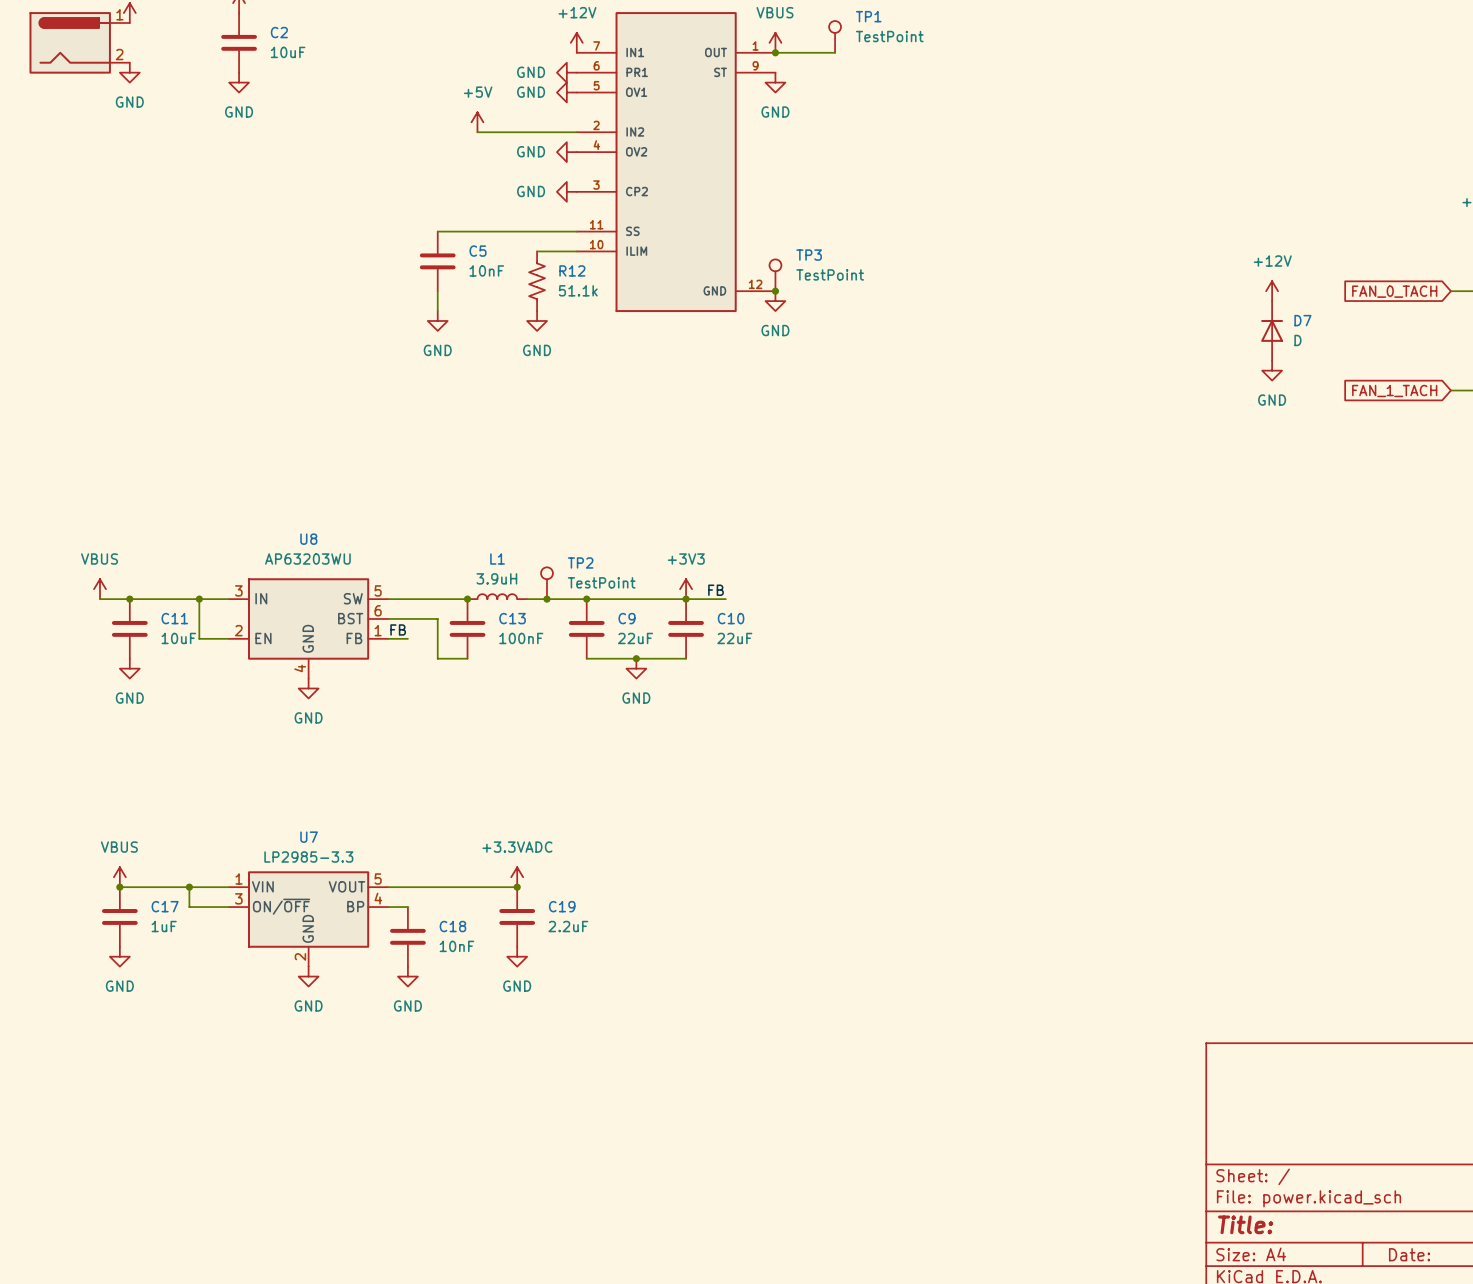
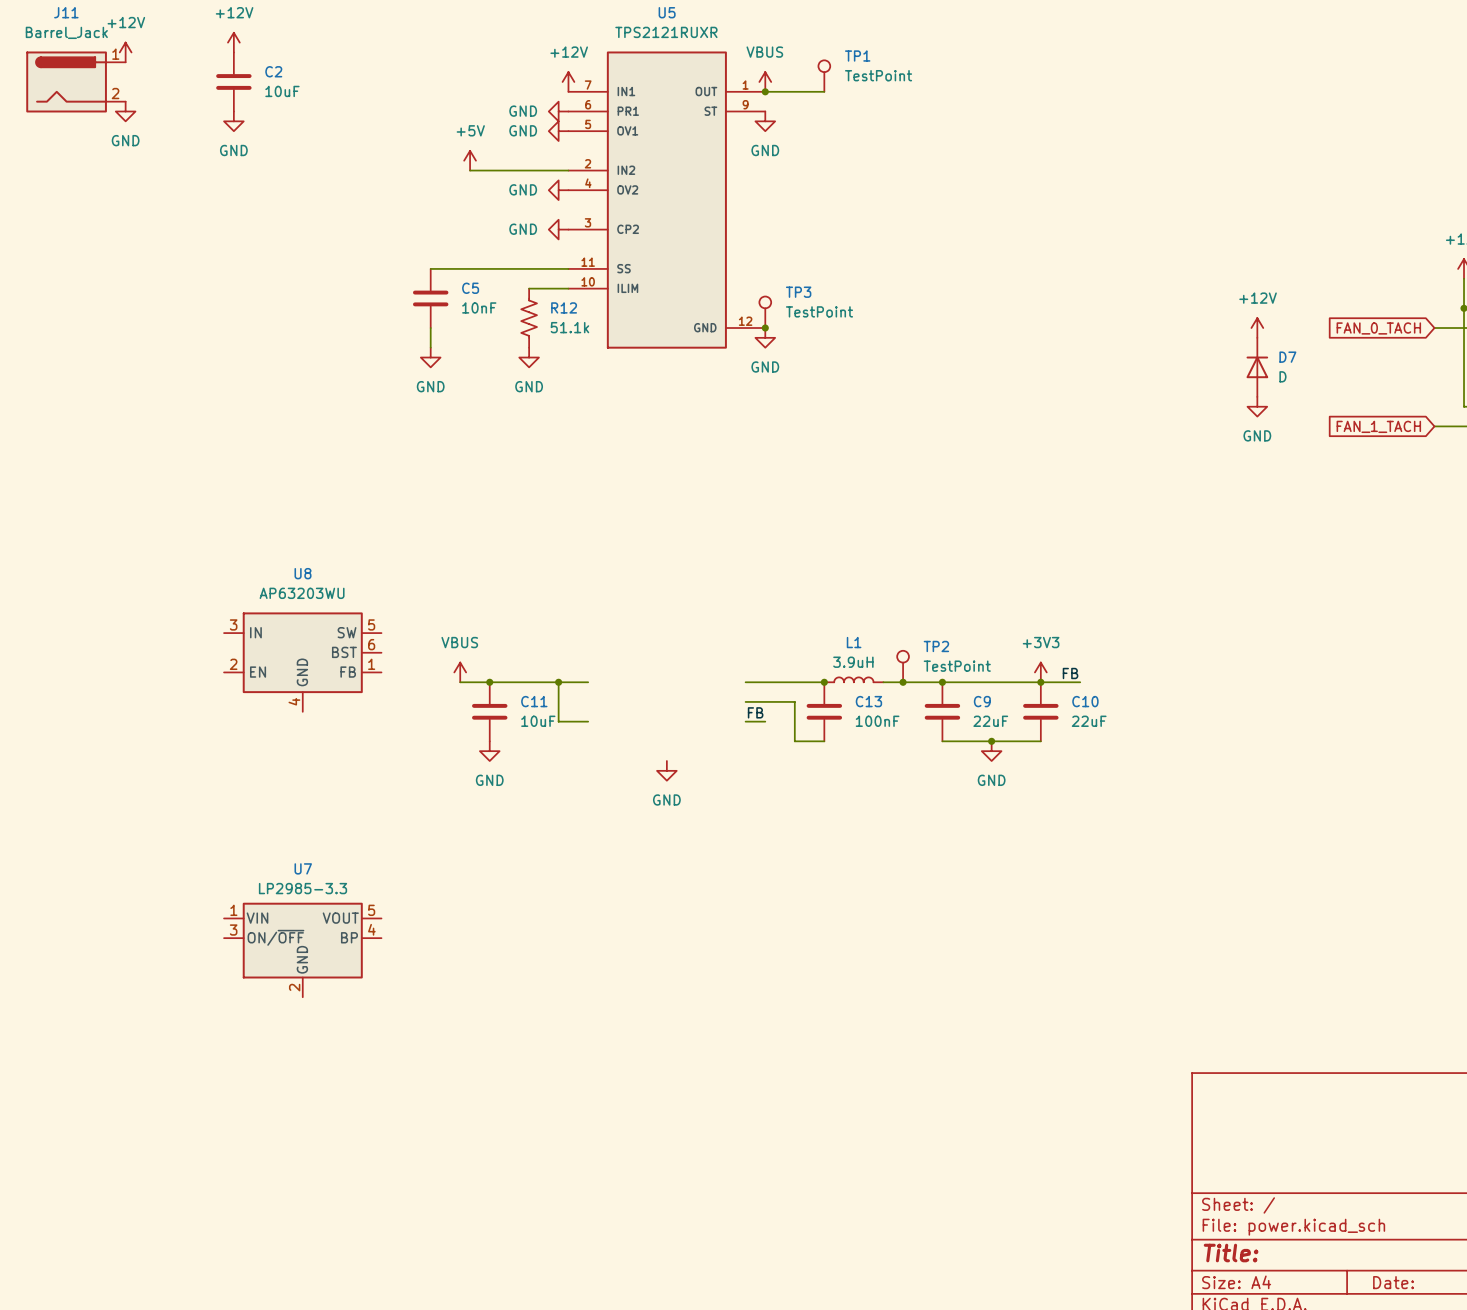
TP2 position: (546, 583) -> (903, 666)
power symbol: VBUS (100, 589) -> none
power symbol: +3V3 (686, 589) -> none
label position: FB (716, 590) -> FB (755, 712)
L1 position: (497, 596) -> (853, 679)
wire: (100, 599) (229, 599) -> none
junction: (129, 599) -> none
wire: (199, 599) (199, 638) (229, 638) -> none
junction: (199, 599) -> none
wire: (388, 599) (467, 599) -> none
junction: (467, 599) -> none
wire: (527, 599) (725, 599) -> none
junction: (546, 599) -> none
junction: (586, 599) -> none
junction: (686, 599) -> none
wire: (388, 618) (437, 618) (437, 658) (467, 658) -> none
C11 position: (129, 628) -> (489, 711)
C13 position: (467, 628) -> (824, 711)
C9 position: (586, 628) -> (942, 711)
C10 position: (686, 628) -> (1040, 711)
label: FB (398, 629) -> none
wire: (388, 638) (407, 638) -> none
power symbol: none -> VBUS (460, 672)
power symbol: none -> +3V3 (1040, 672)
label: none -> FB (1070, 673)
wire: none -> (460, 682) (588, 682)
junction: none -> (489, 682)
wire: none -> (558, 682) (558, 721) (588, 721)
junction: none -> (558, 682)
wire: none -> (745, 682) (824, 682)
junction: none -> (824, 682)
wire: none -> (883, 682) (1080, 682)
junction: none -> (903, 682)
junction: none -> (942, 682)
junction: none -> (1040, 682)
wire: (586, 658) (686, 658) -> none
junction: (636, 658) -> none
power symbol: GND (129, 668) -> none
power symbol: GND (636, 668) -> none
wire: none -> (745, 701) (794, 701) (794, 741) (824, 741)
power symbol: GND (308, 688) -> none
wire: none -> (745, 721) (765, 721)
wire: none -> (942, 741) (1040, 741)
junction: none -> (991, 741)
power symbol: none -> GND (489, 751)
power symbol: none -> GND (991, 751)
power symbol: none -> GND (666, 770)
power symbol: VBUS (119, 877) -> none
power symbol: +3.3VADC (517, 877) -> none
wire: (119, 887) (229, 887) -> none
junction: (119, 887) -> none
wire: (189, 887) (189, 907) (229, 907) -> none
junction: (189, 887) -> none
wire: (388, 887) (517, 887) -> none
junction: (517, 887) -> none
wire: (388, 907) (407, 907) -> none
C17: 1uF (119, 916) -> none
C19: 2.2uF (517, 916) -> none
C18: 10nF (407, 936) -> none
power symbol: GND (119, 956) -> none
power symbol: GND (517, 956) -> none
power symbol: GND (308, 976) -> none
power symbol: GND (407, 976) -> none

